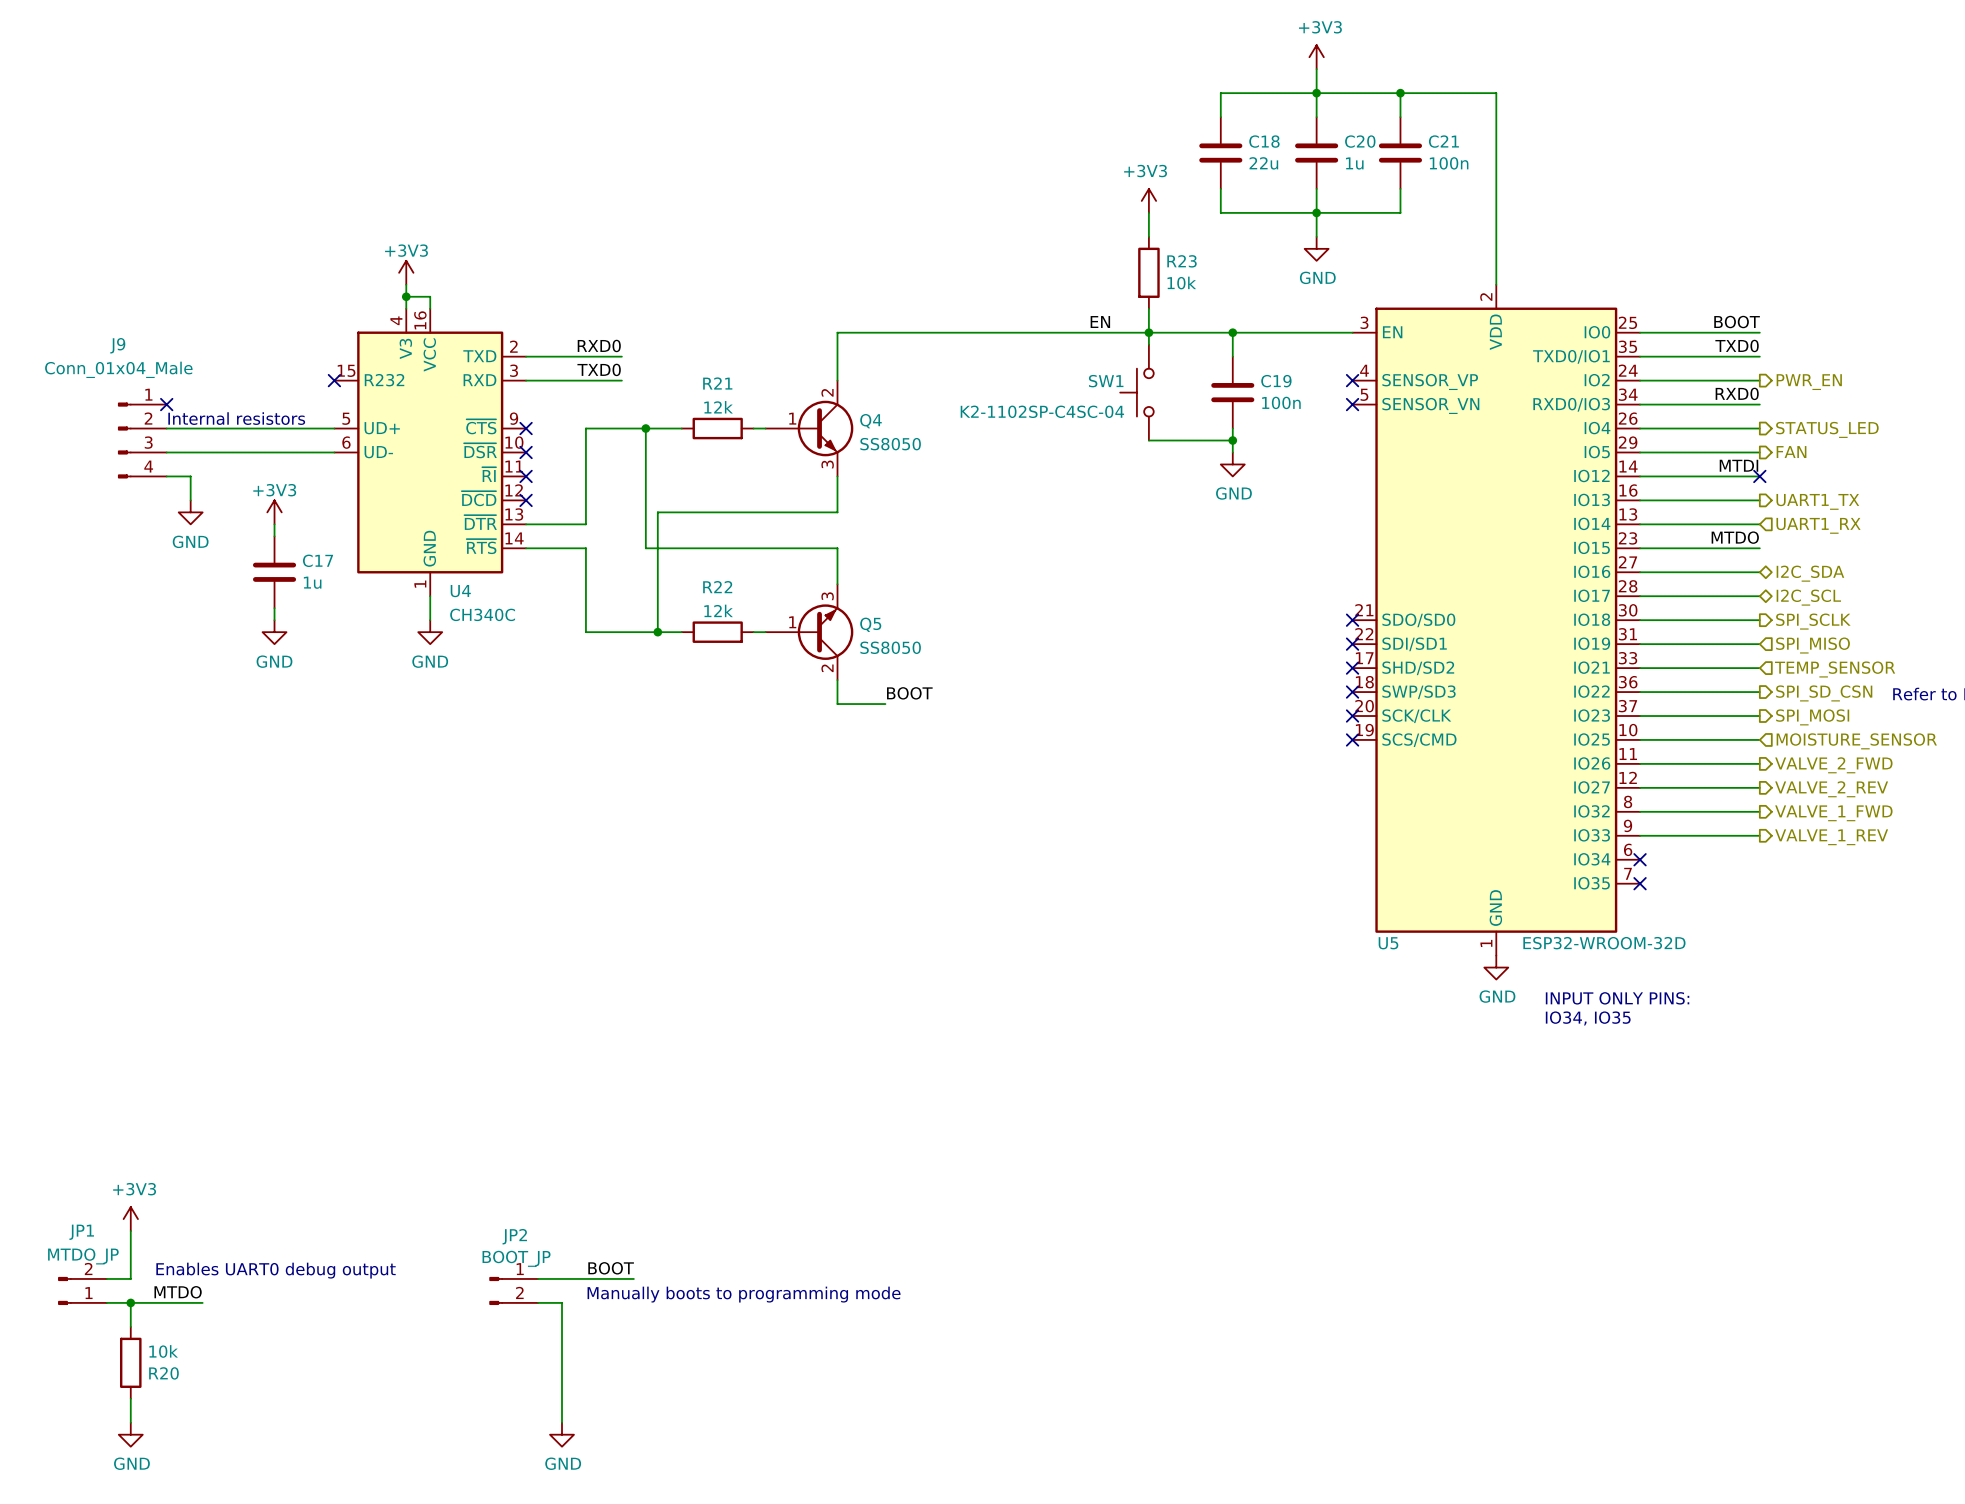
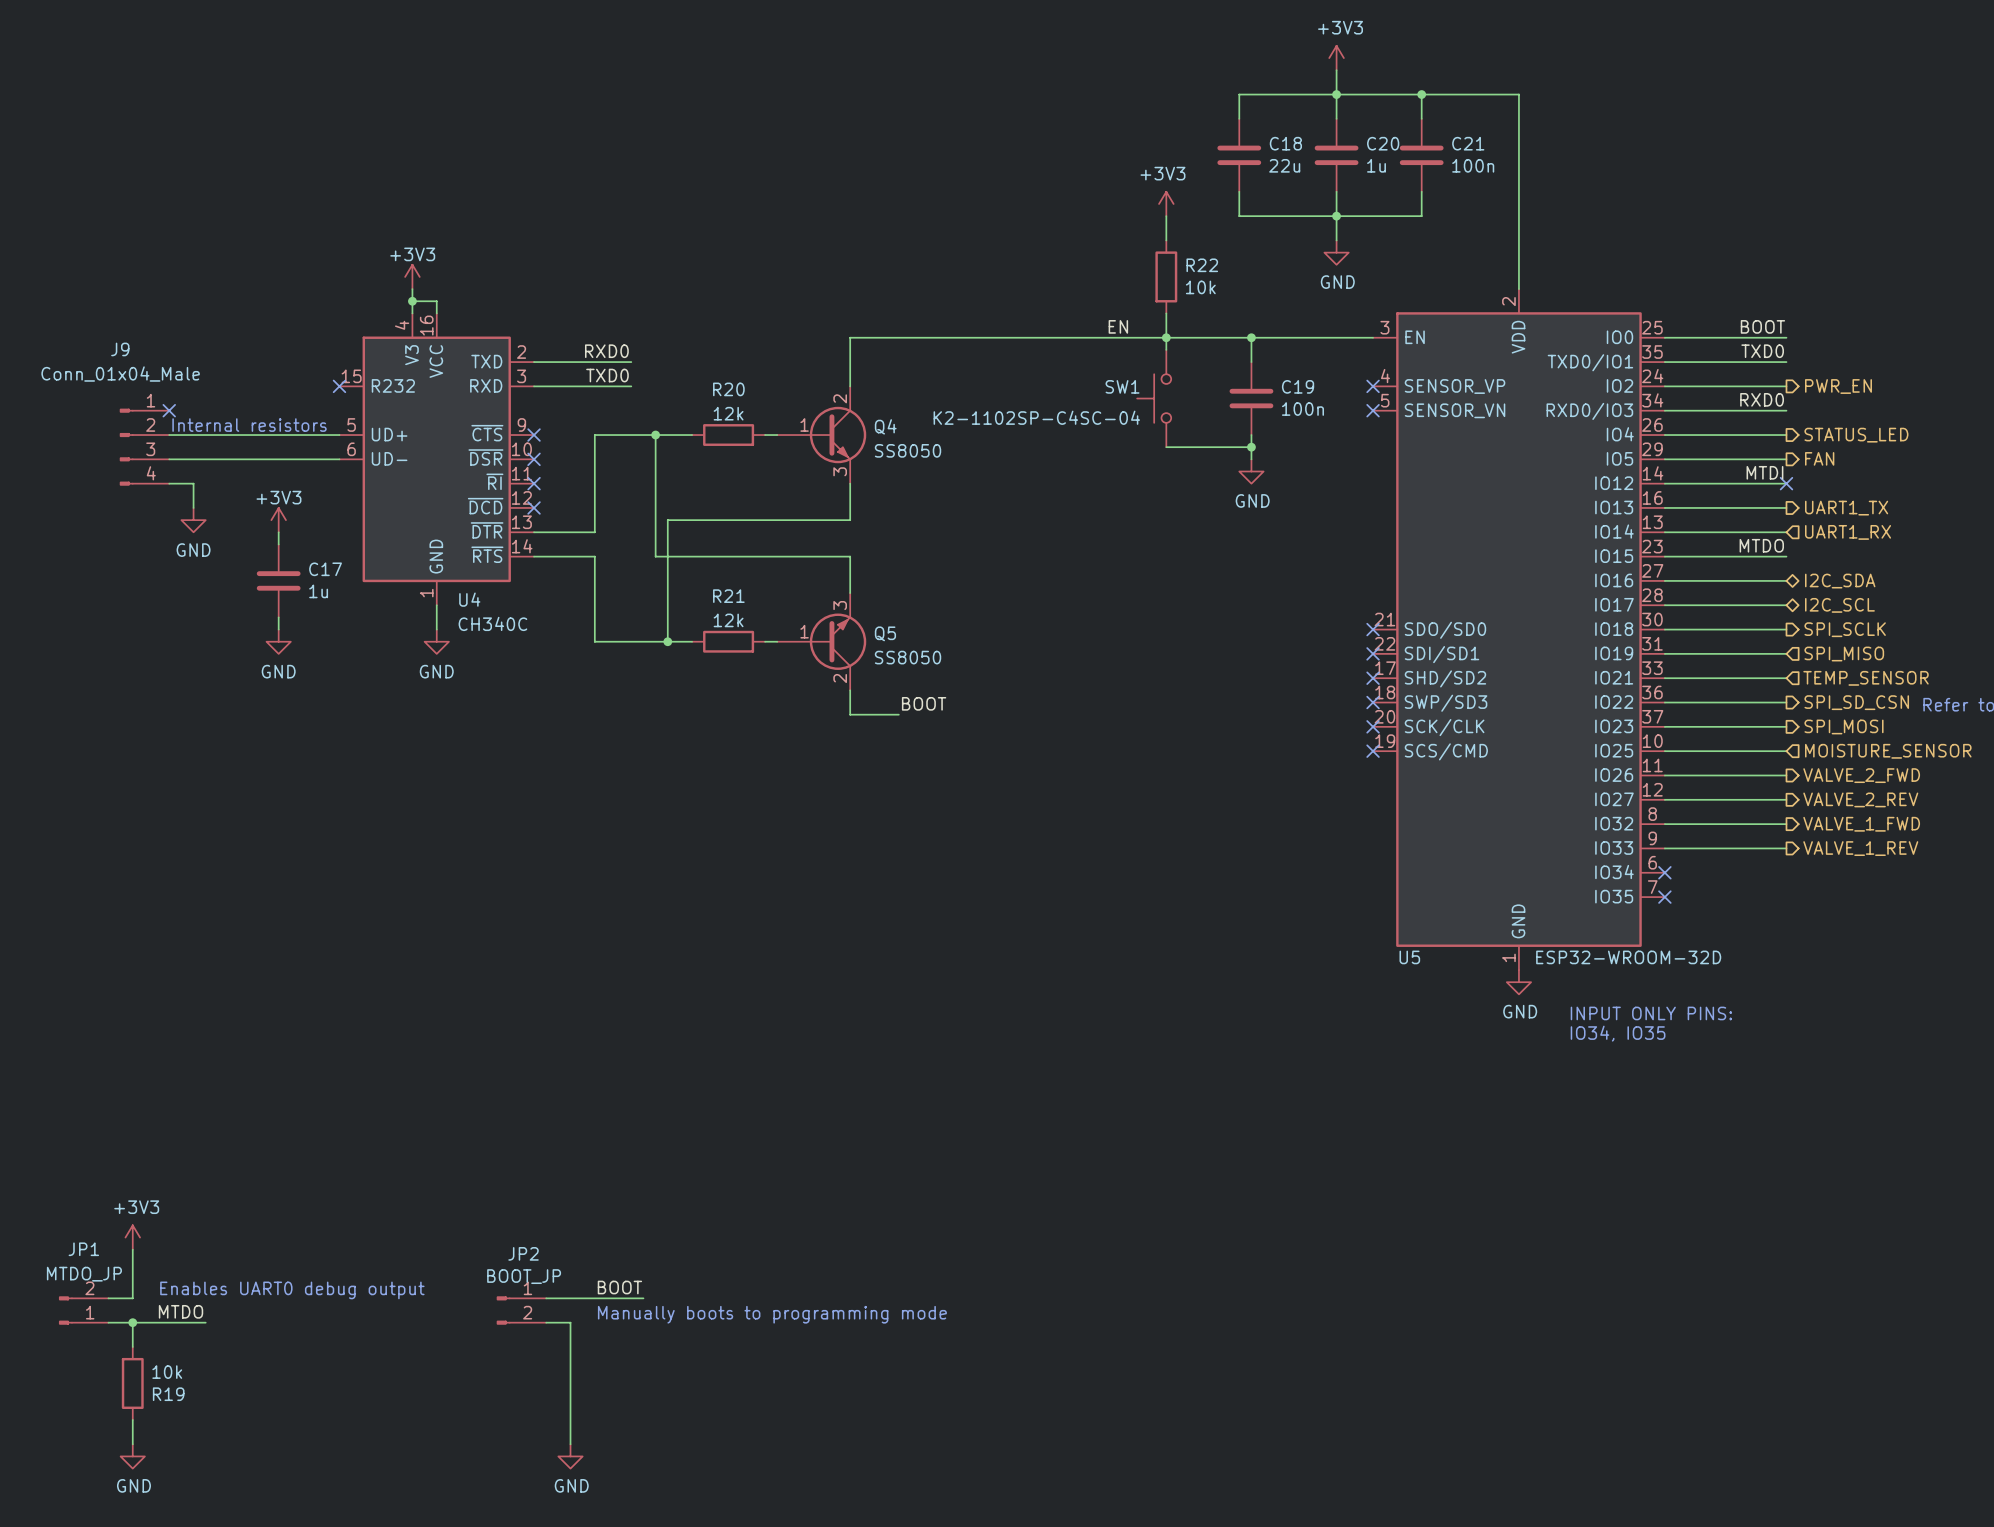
R23 name: R23 (1182, 261) -> R22 (1202, 265)
R21 name: R21 (717, 383) -> R20 (728, 389)
R22 name: R22 (717, 587) -> R21 (728, 596)
R20 name: R20 (163, 1373) -> R19 (168, 1394)

